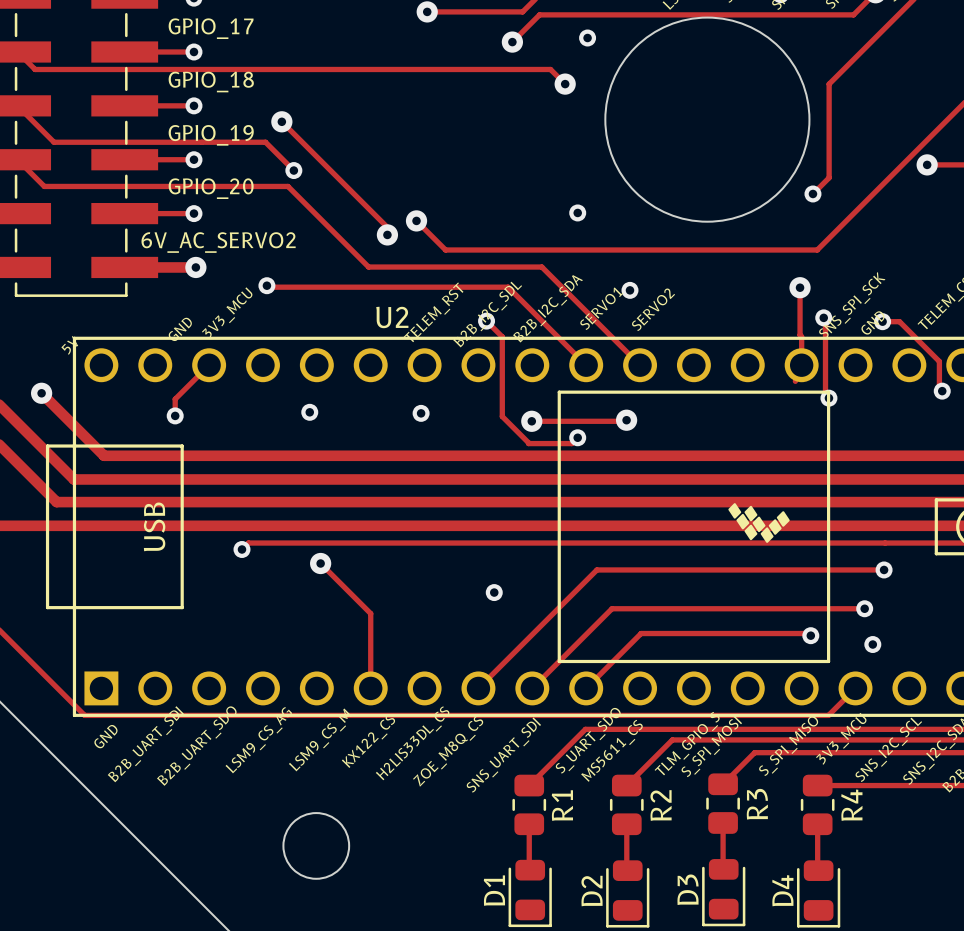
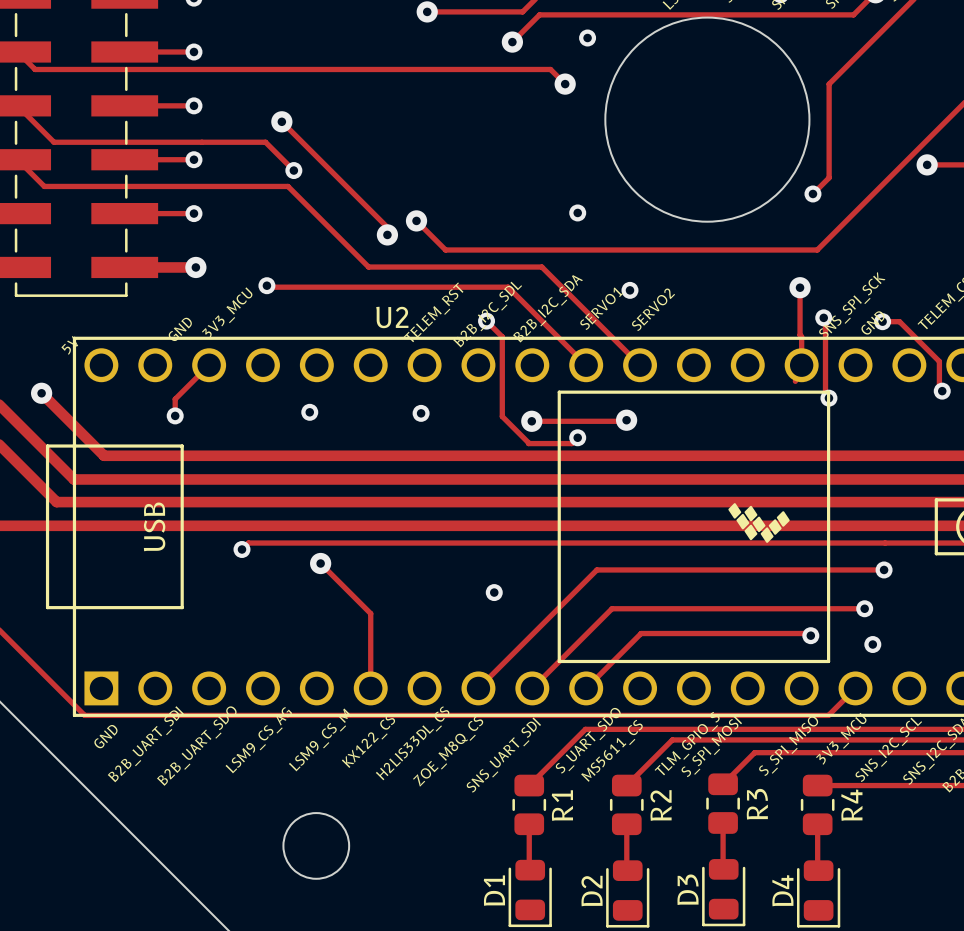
text: GPIO_17 (211, 28) -> none
text: GPIO_18 (211, 82) -> none
text: GPIO_19 (211, 135) -> none
text: GPIO_20 (211, 188) -> none
text: 6V_AC_SERVO2 (218, 242) -> none

